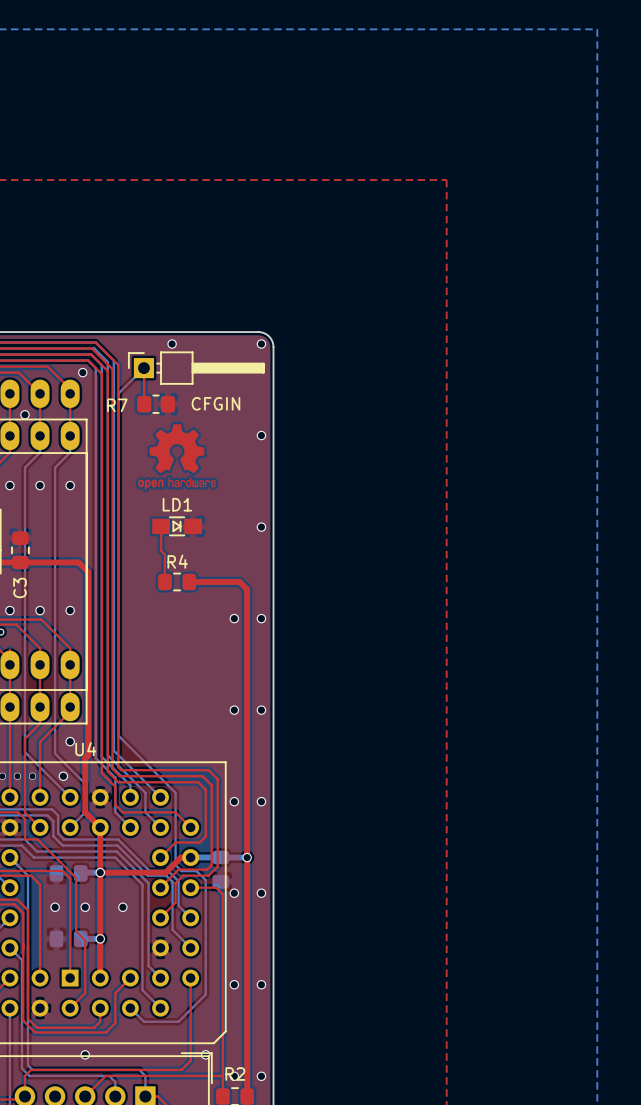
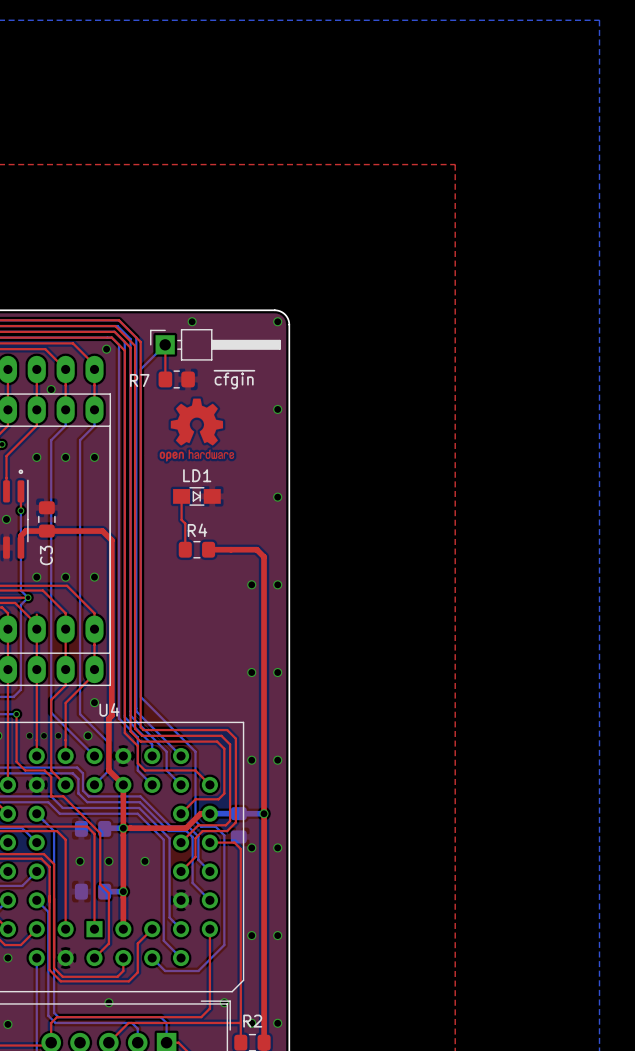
part value: CFGIN (215, 403) -> ~{cfgin} (234, 379)

